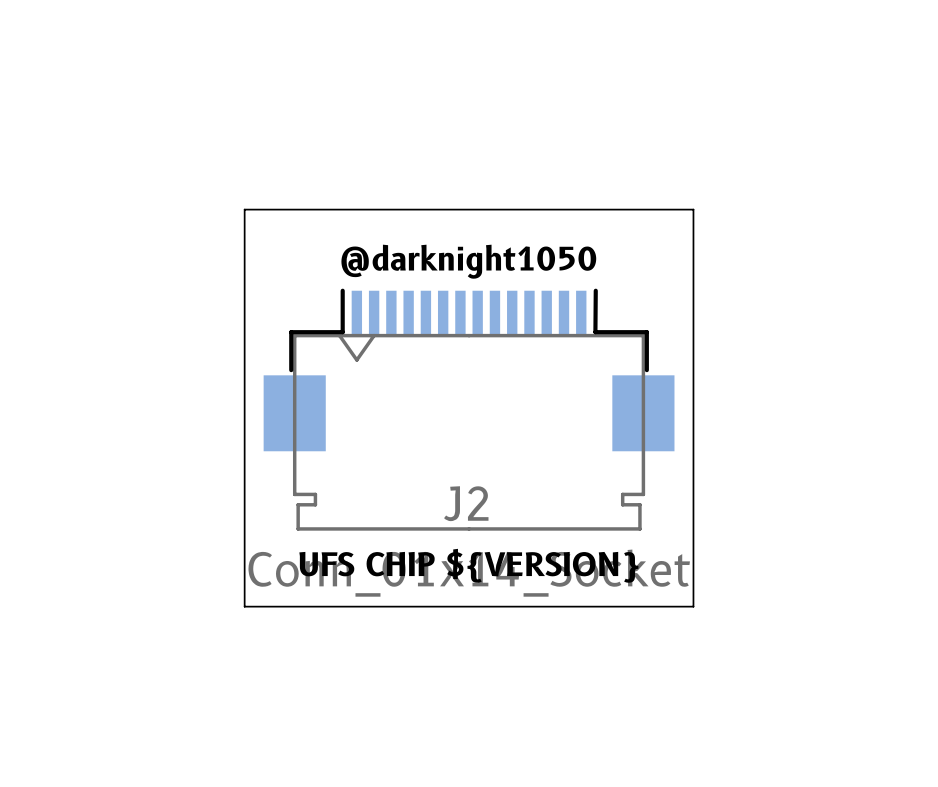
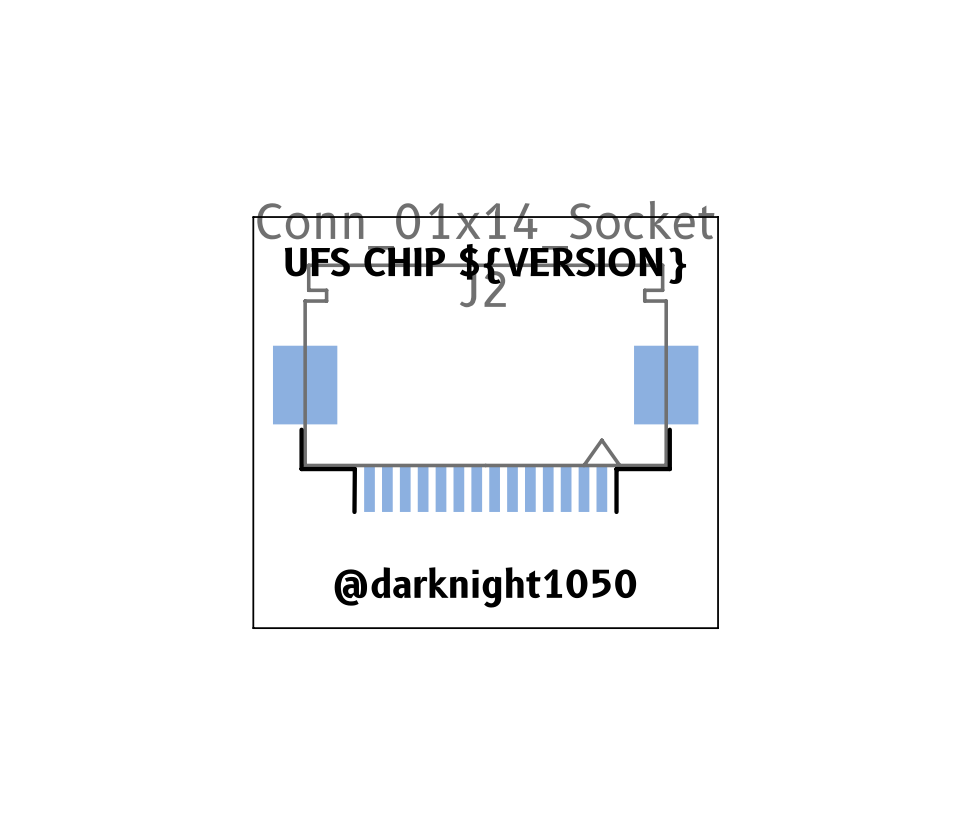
text: @darknight1050 (468, 261) -> UFS CHIP ${VERSION} (485, 263)
J2 rotation: 0° (469, 409) -> 180° (485, 388)
text: UFS CHIP ${VERSION} (468, 565) -> @darknight1050 (485, 587)

